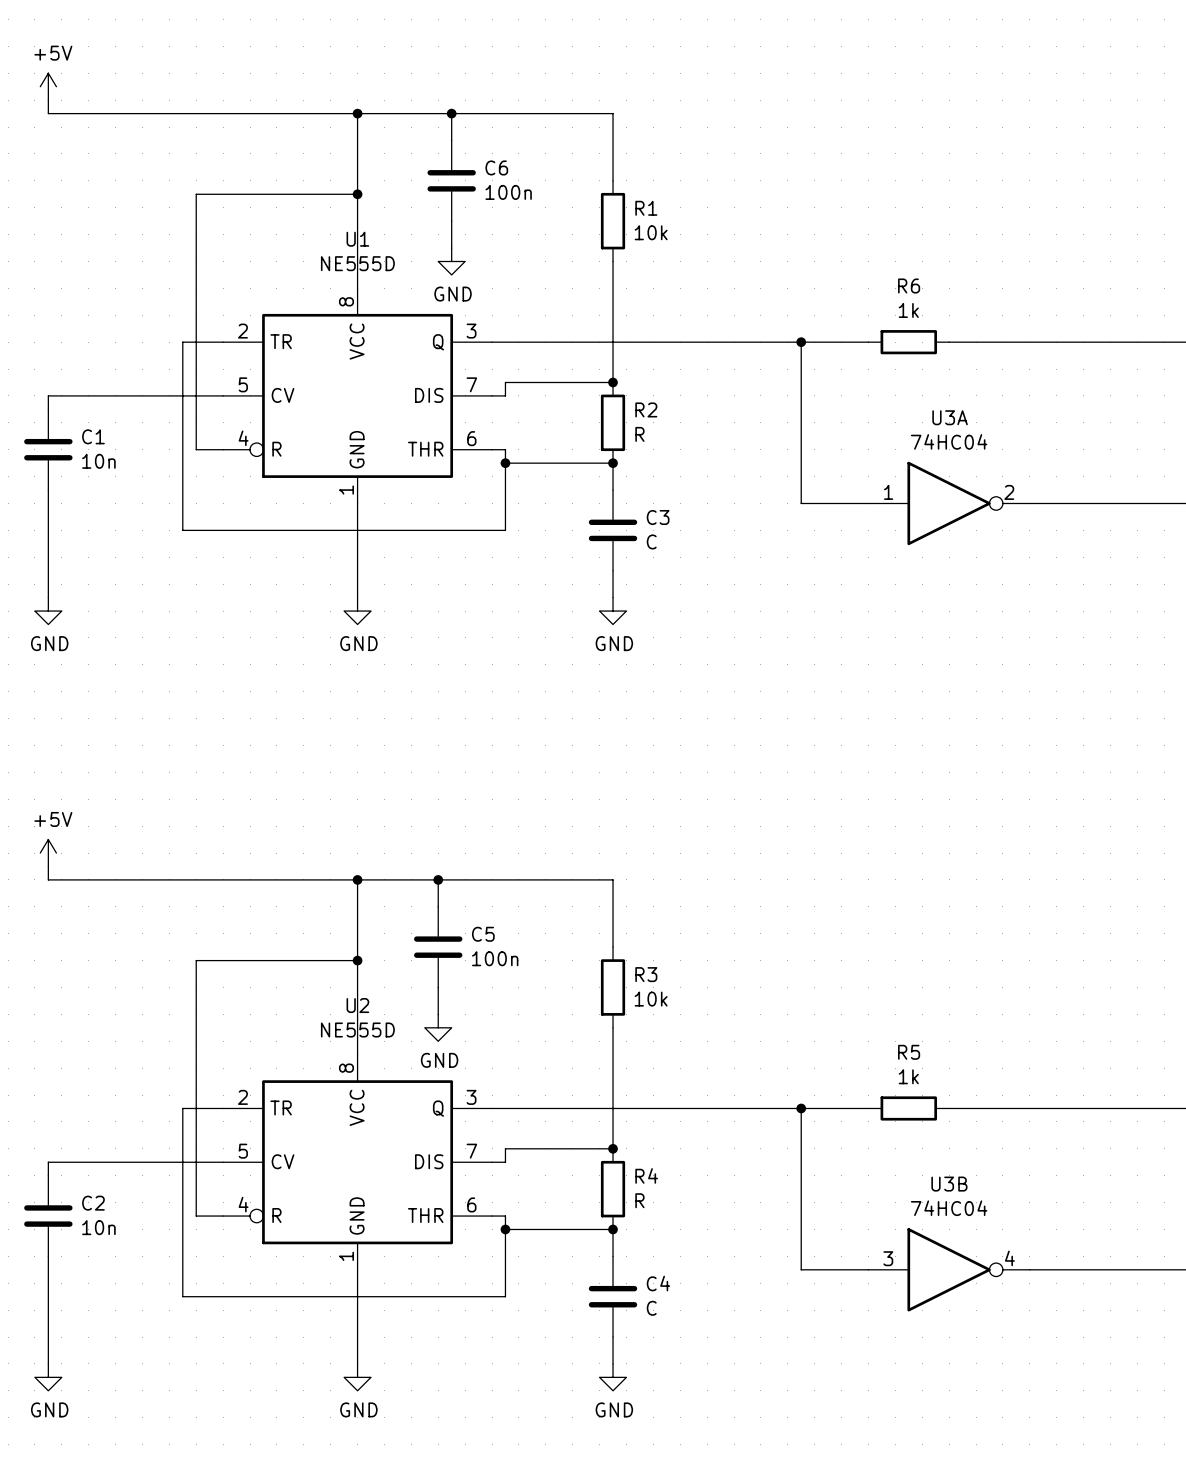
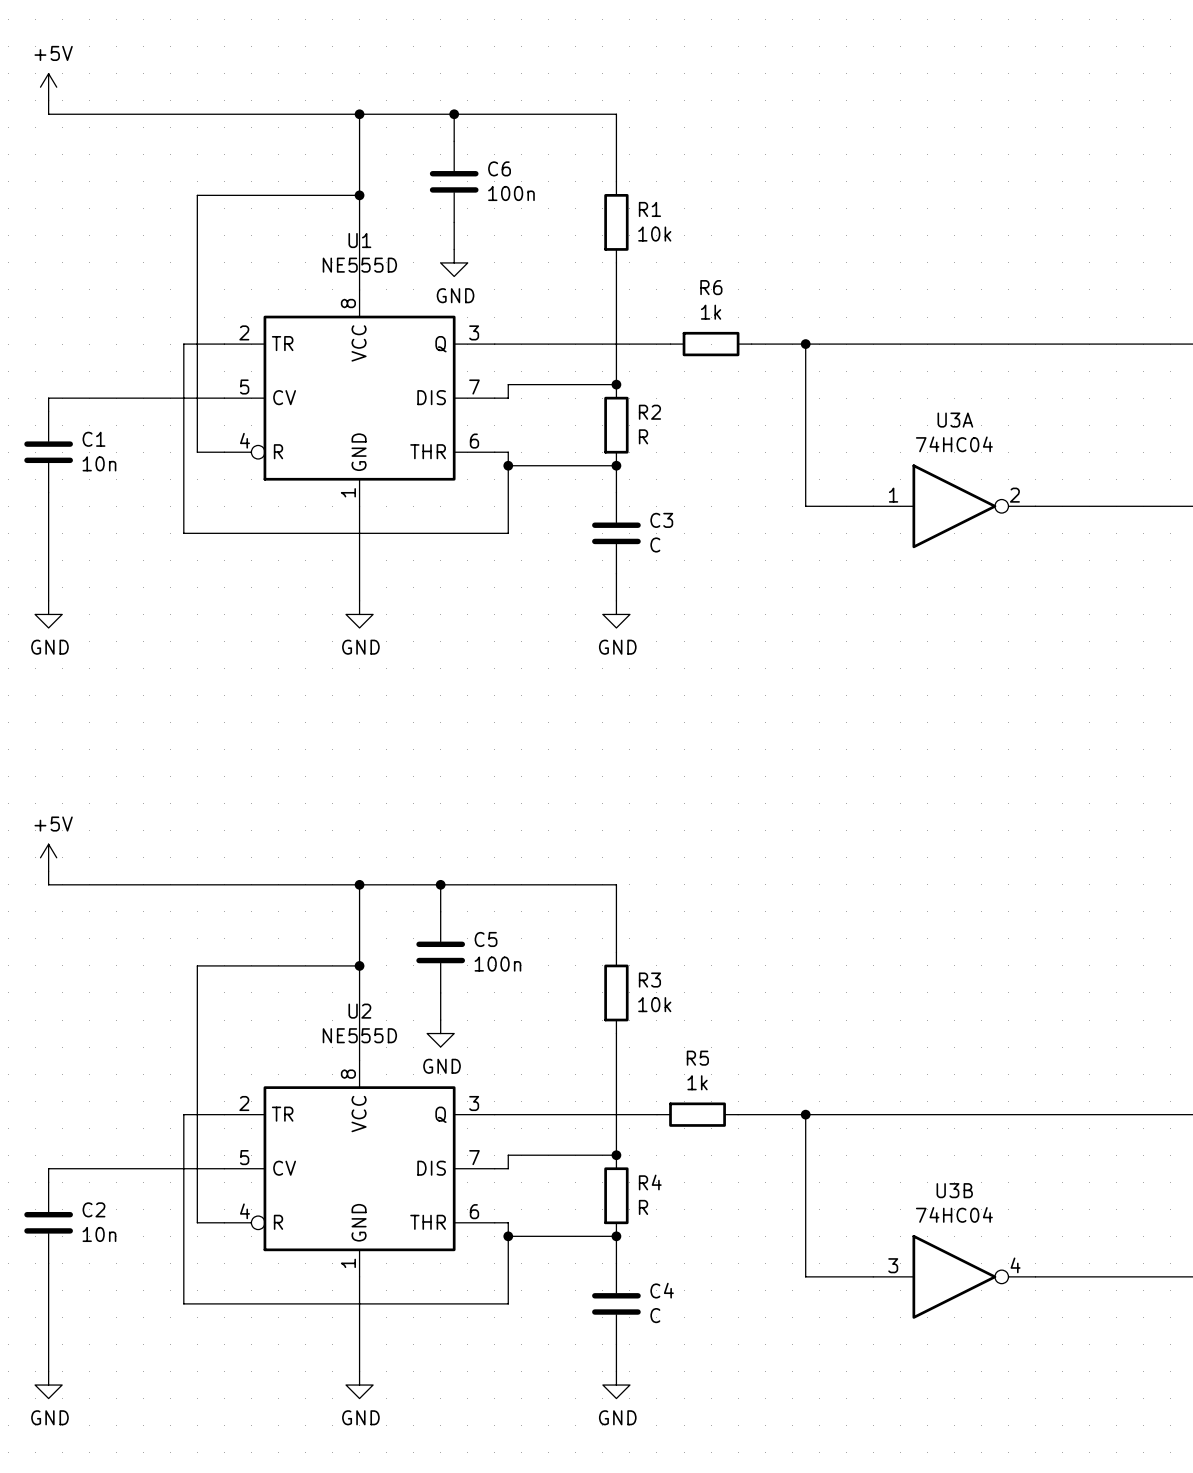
wire: (666, 342) (747, 342) -> (873, 344) (954, 344)
R6 position: (908, 342) -> (711, 344)
wire: (653, 1108) (734, 1108) -> (873, 1114) (954, 1114)
R5 position: (908, 1108) -> (697, 1114)

